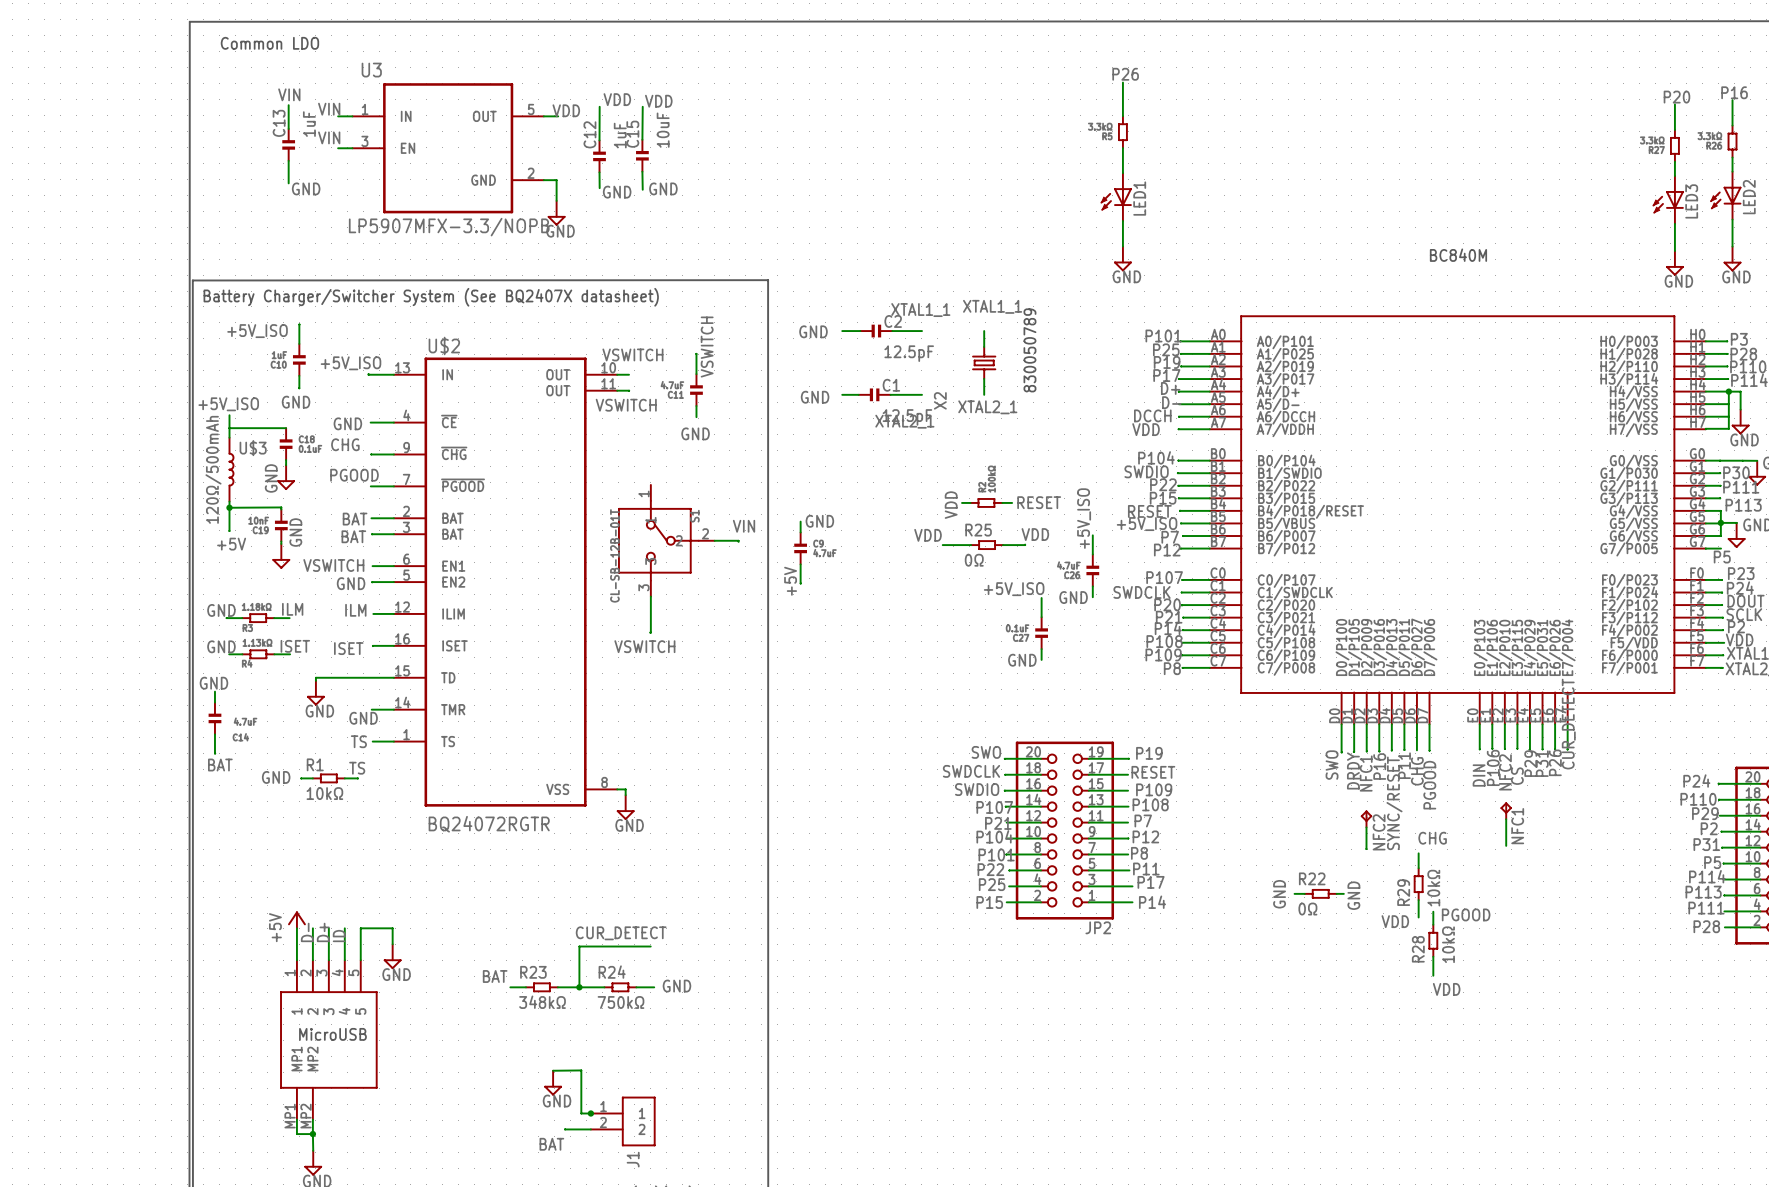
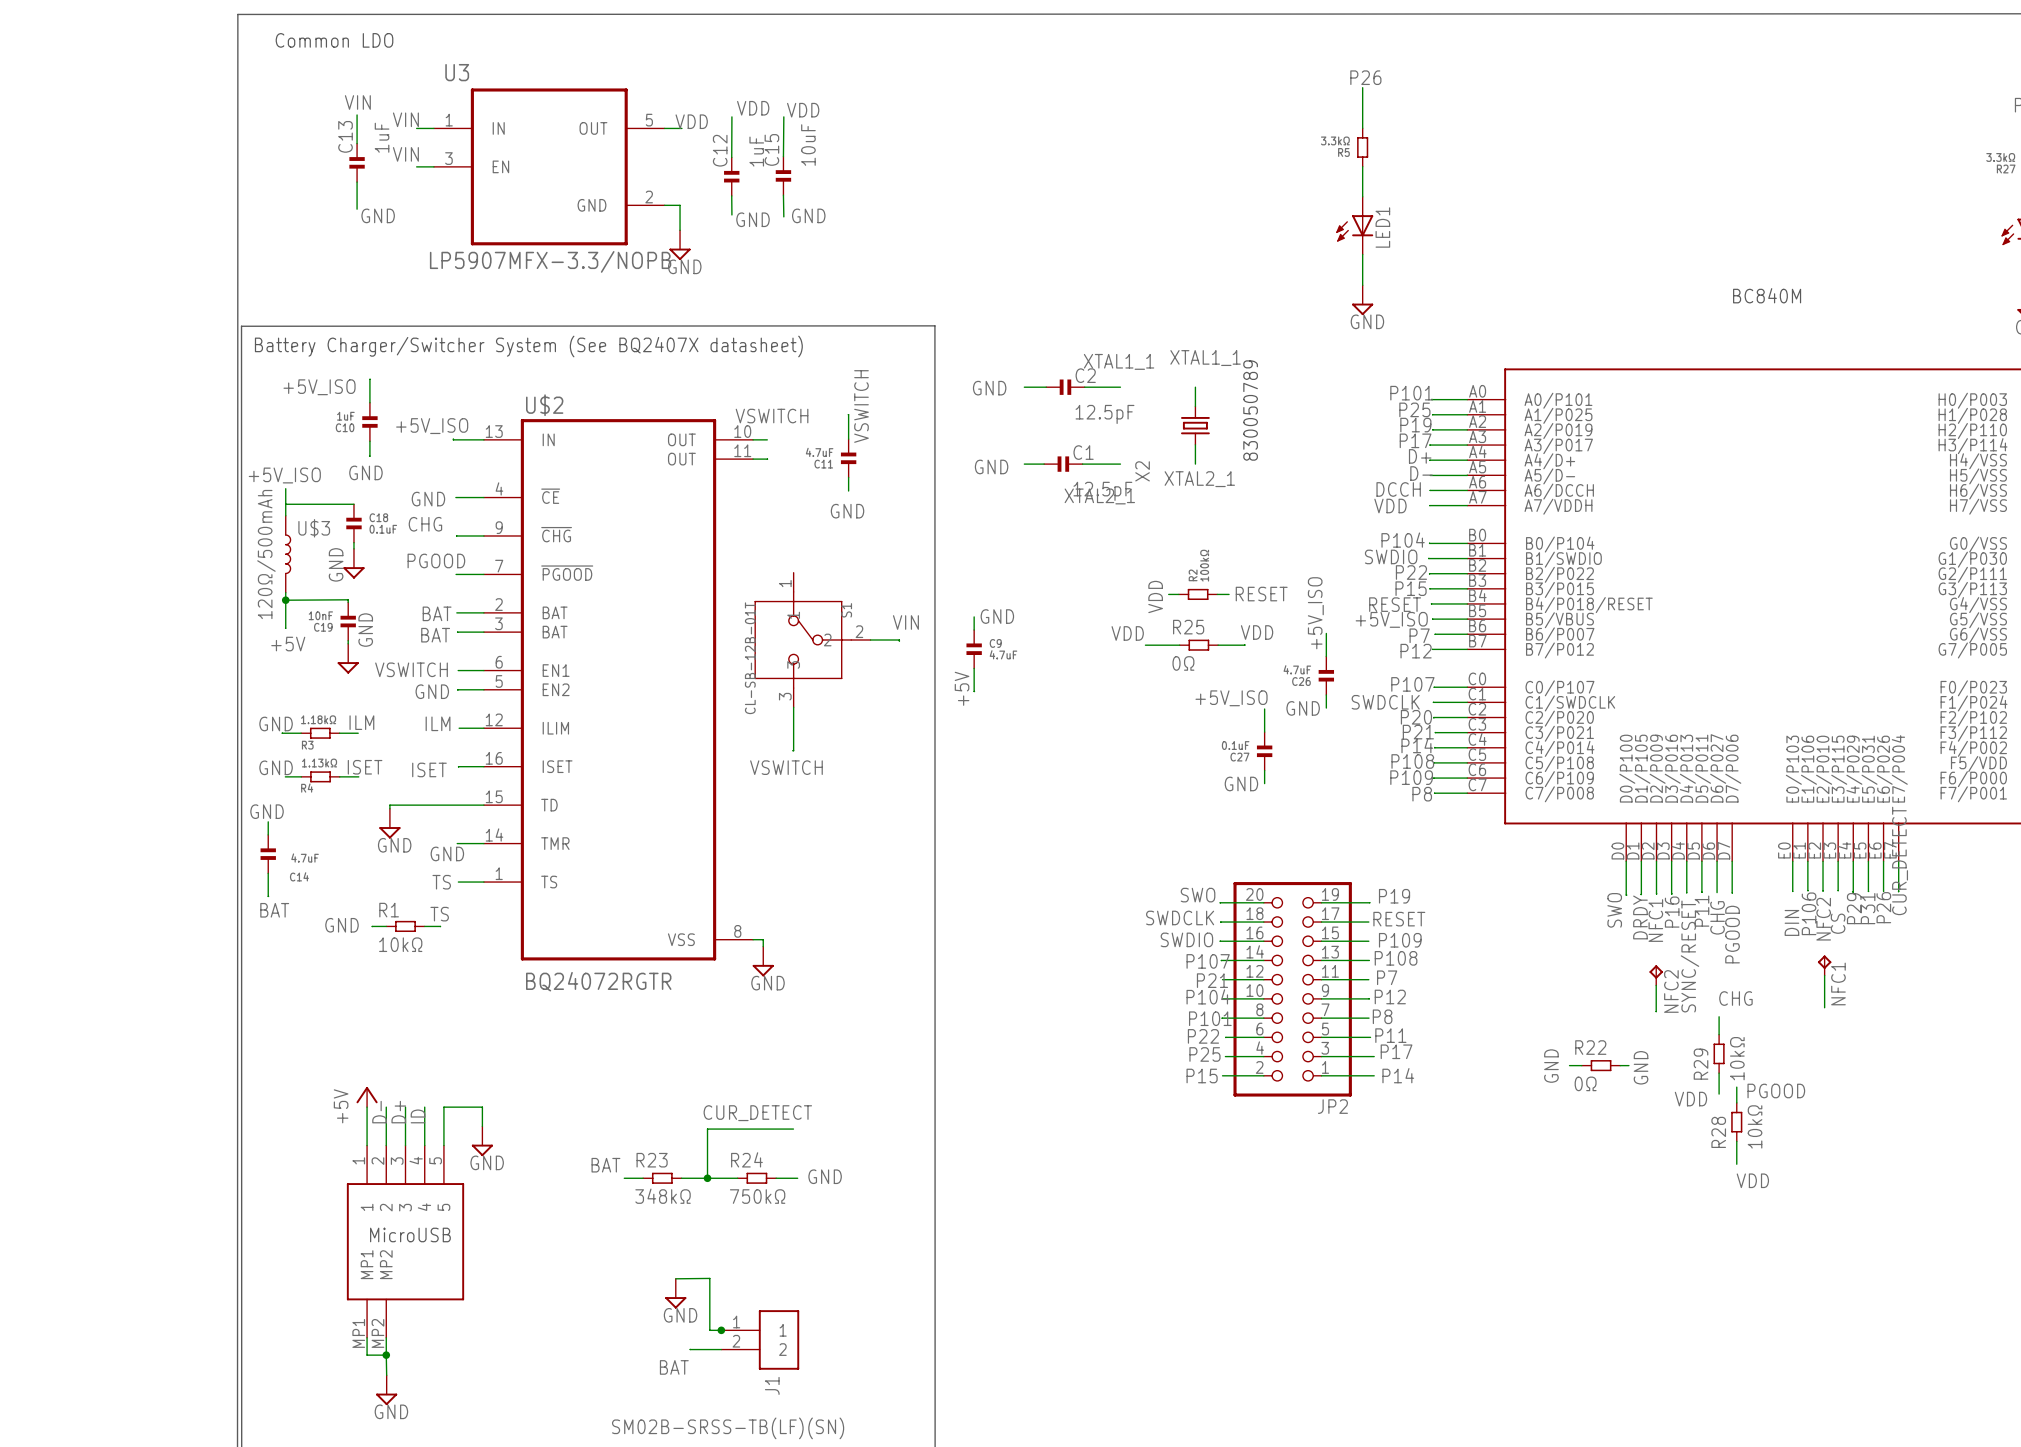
label: VSWITCH (626, 405) -> none

